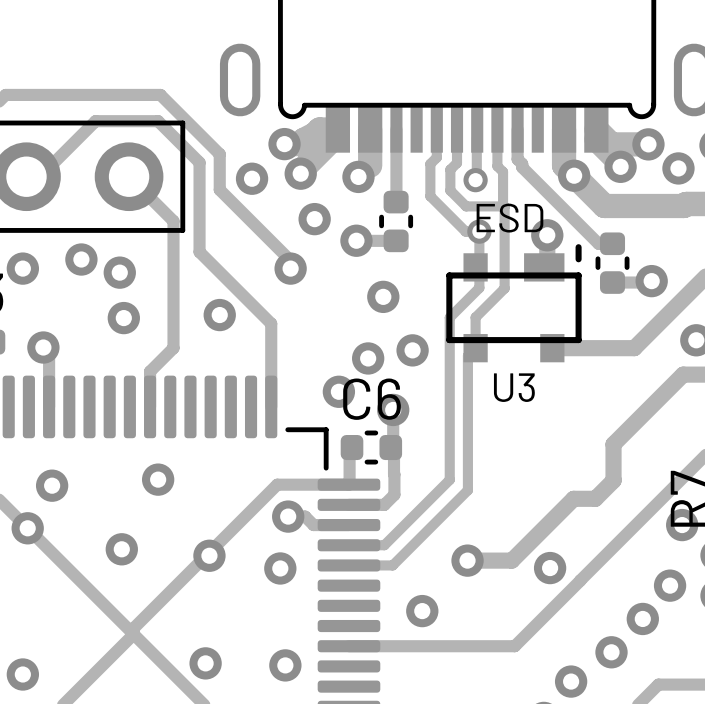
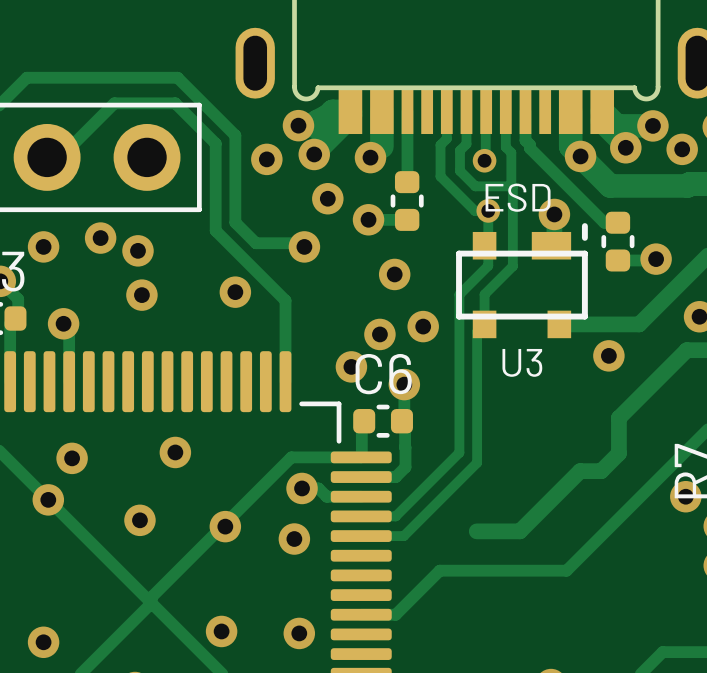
track: (129, 176) (173, 221) (173, 348) (150, 371) (150, 406) -> none
track: (219, 189) (291, 261) (291, 264) -> (235, 170) (235, 222) (255, 243) (305, 243)
via: none -> (608, 355)
via: (467, 560) -> none
via: (550, 568) -> none
track: (580, 580) (514, 646) (384, 646) -> (586, 550) (566, 570) (439, 570) (395, 614)
via: (670, 585) -> none
via: (422, 611) -> none
via: (642, 618) -> none
via: (611, 652) -> none
via: (571, 681) -> none

